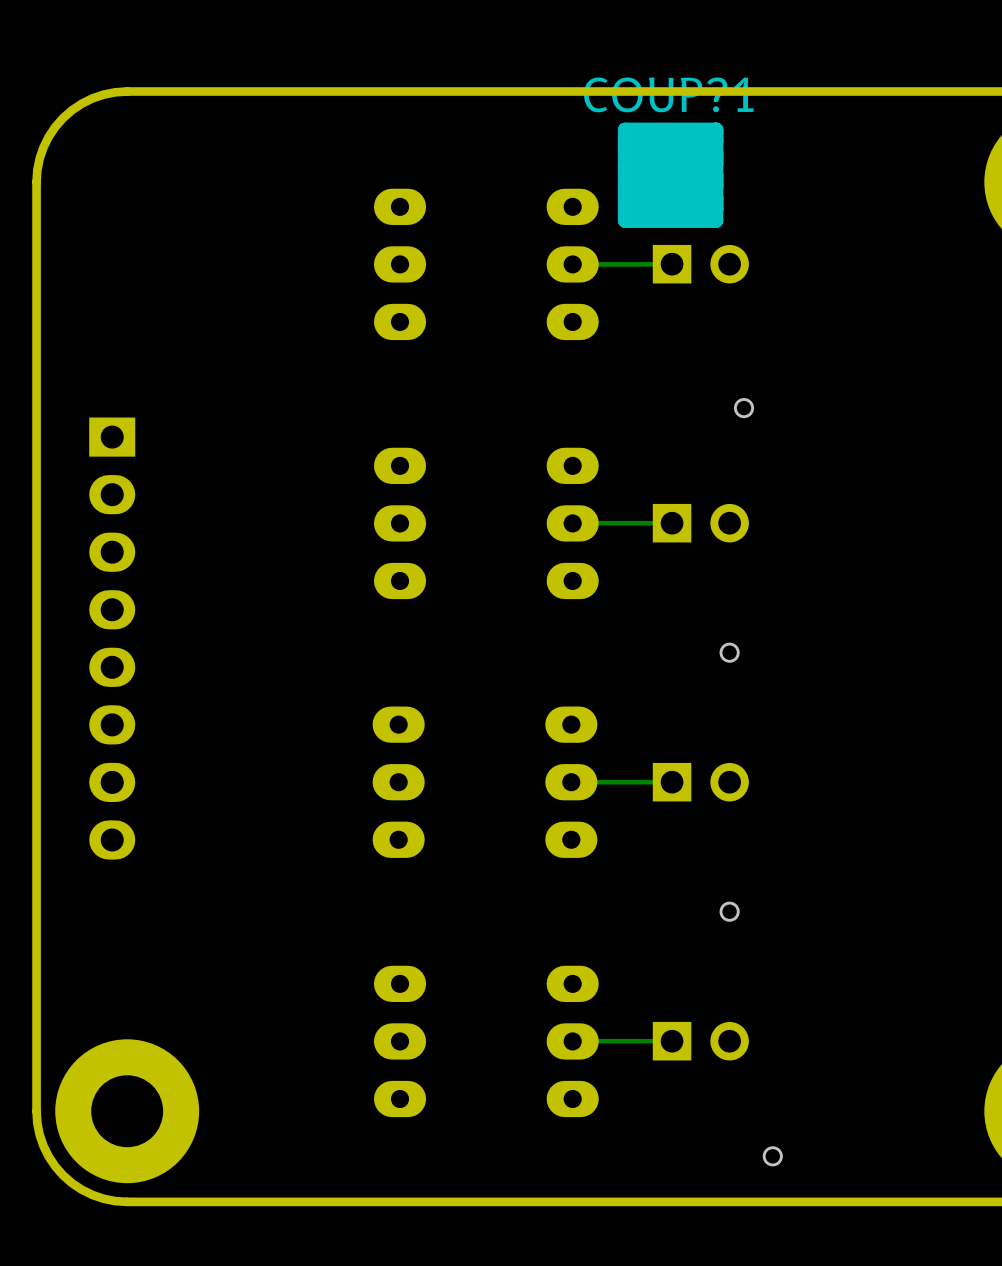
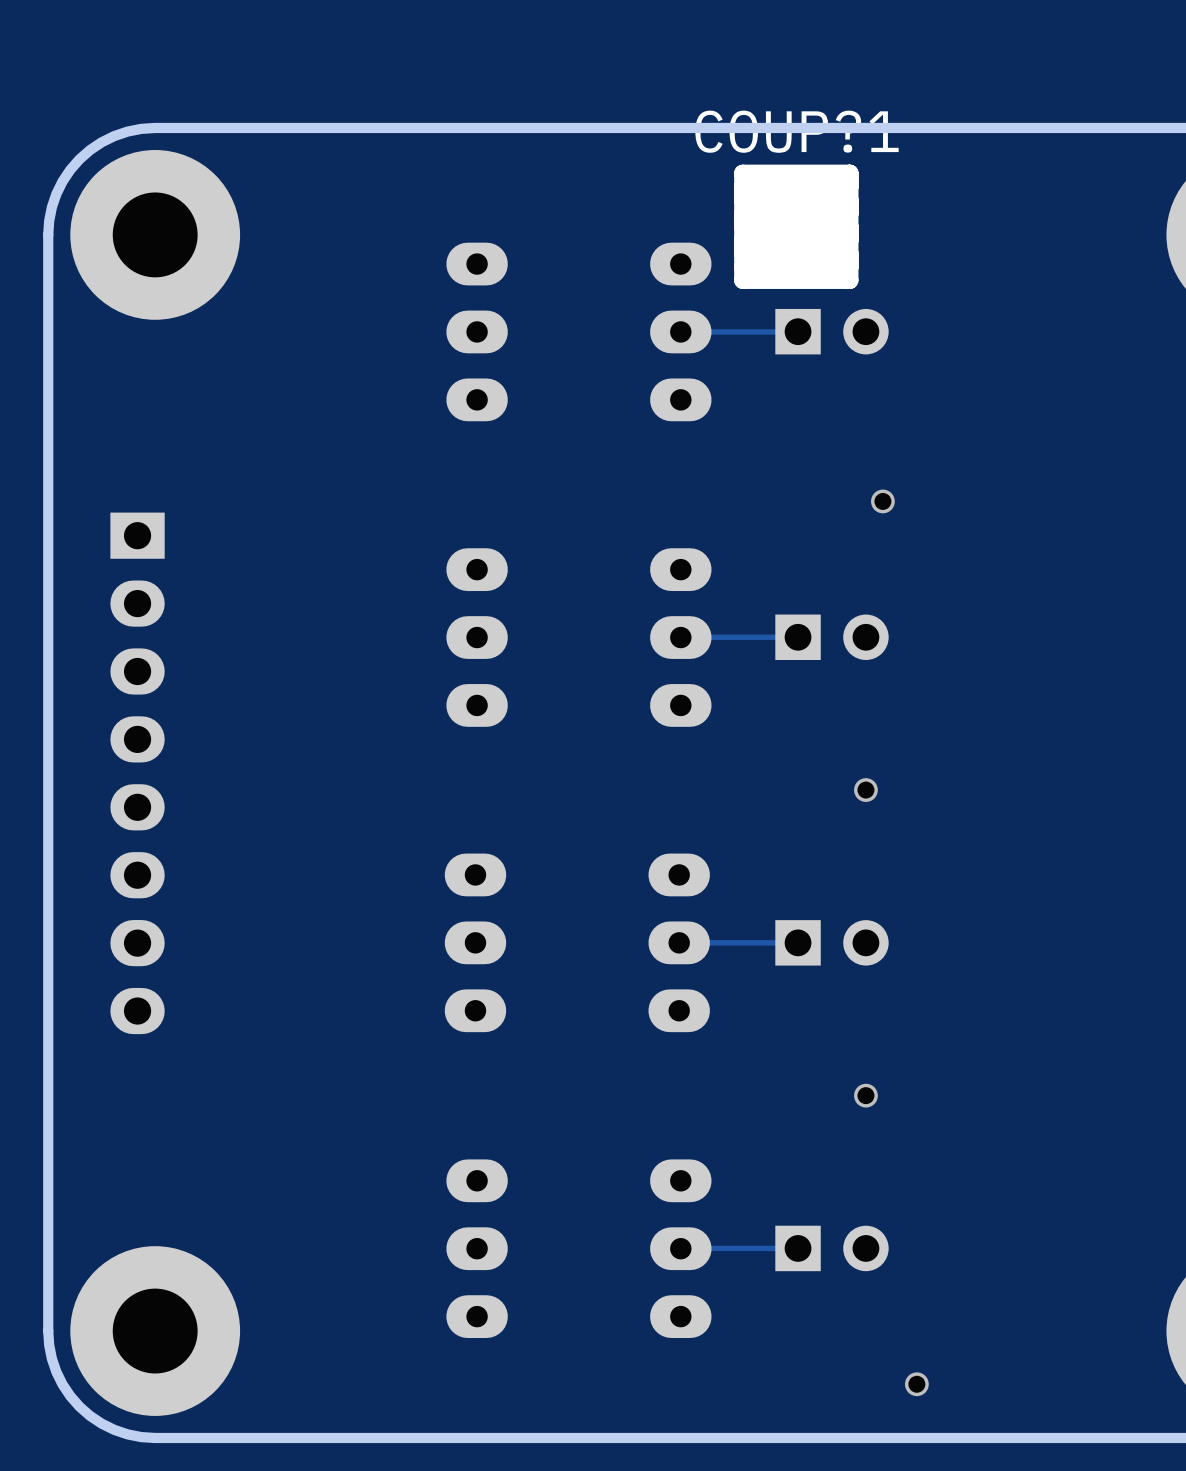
part: none -> (155, 234)

